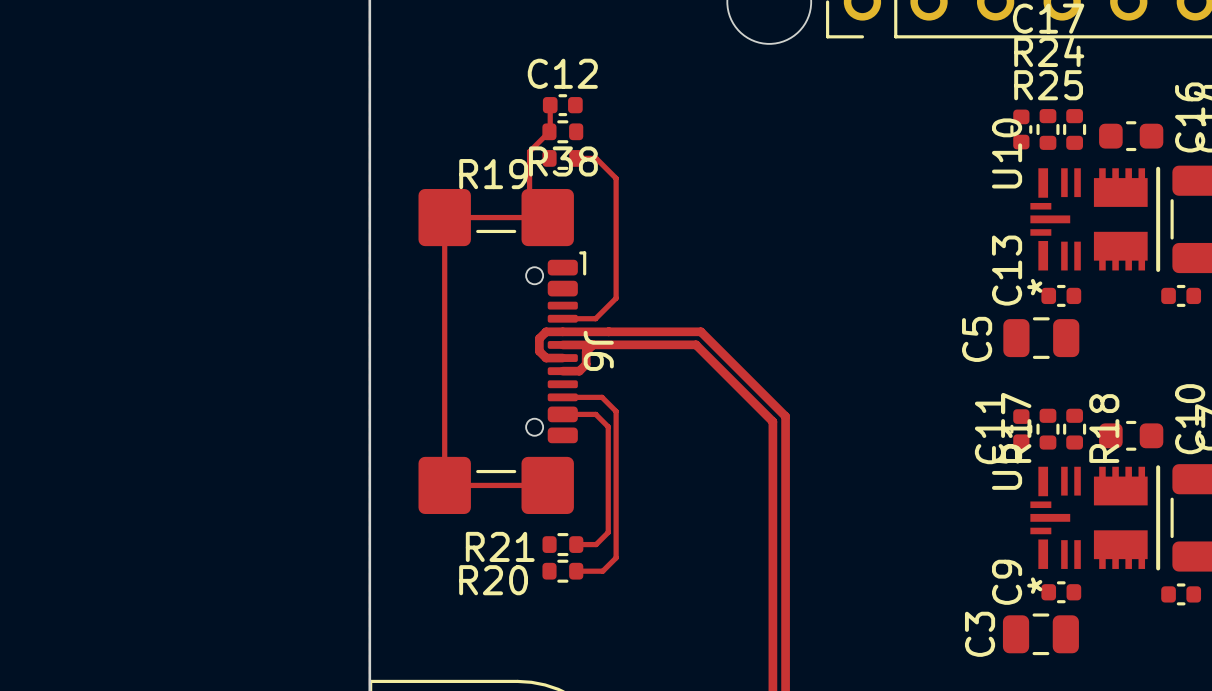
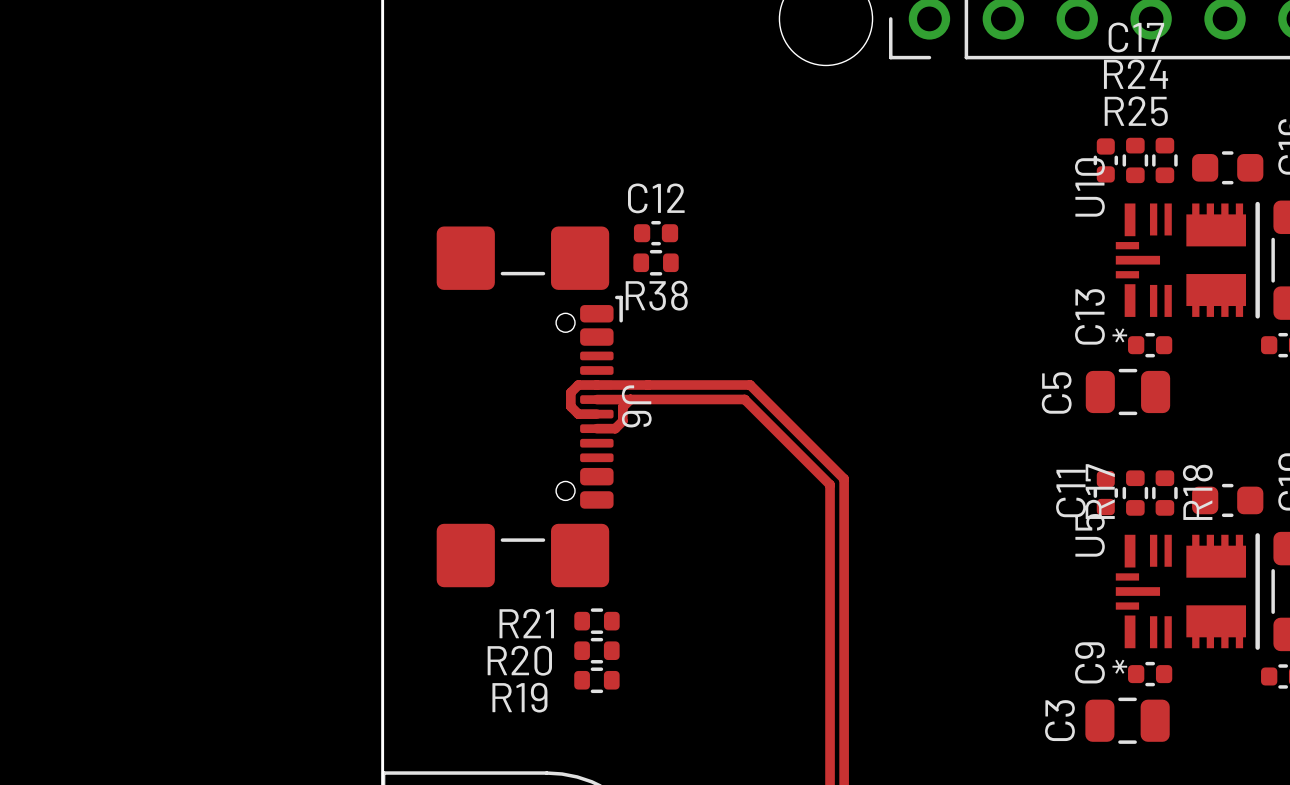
track: (550, 105) (550, 131) (529, 151) (529, 199) (547, 217) (444, 217) (444, 485) (547, 485) -> none
C12 position: (562, 105) -> (656, 233)
R38 position: (562, 131) -> (656, 262)
R19 position: (562, 158) -> (596, 680)
track: (576, 158) (596, 158) (616, 178) (616, 298) (595, 318) (562, 318) -> none
track: (562, 397) (602, 397) (616, 411) (616, 557) (602, 571) (576, 571) -> none
track: (562, 414) (595, 414) (608, 426) (608, 532) (596, 544) (576, 544) -> none

